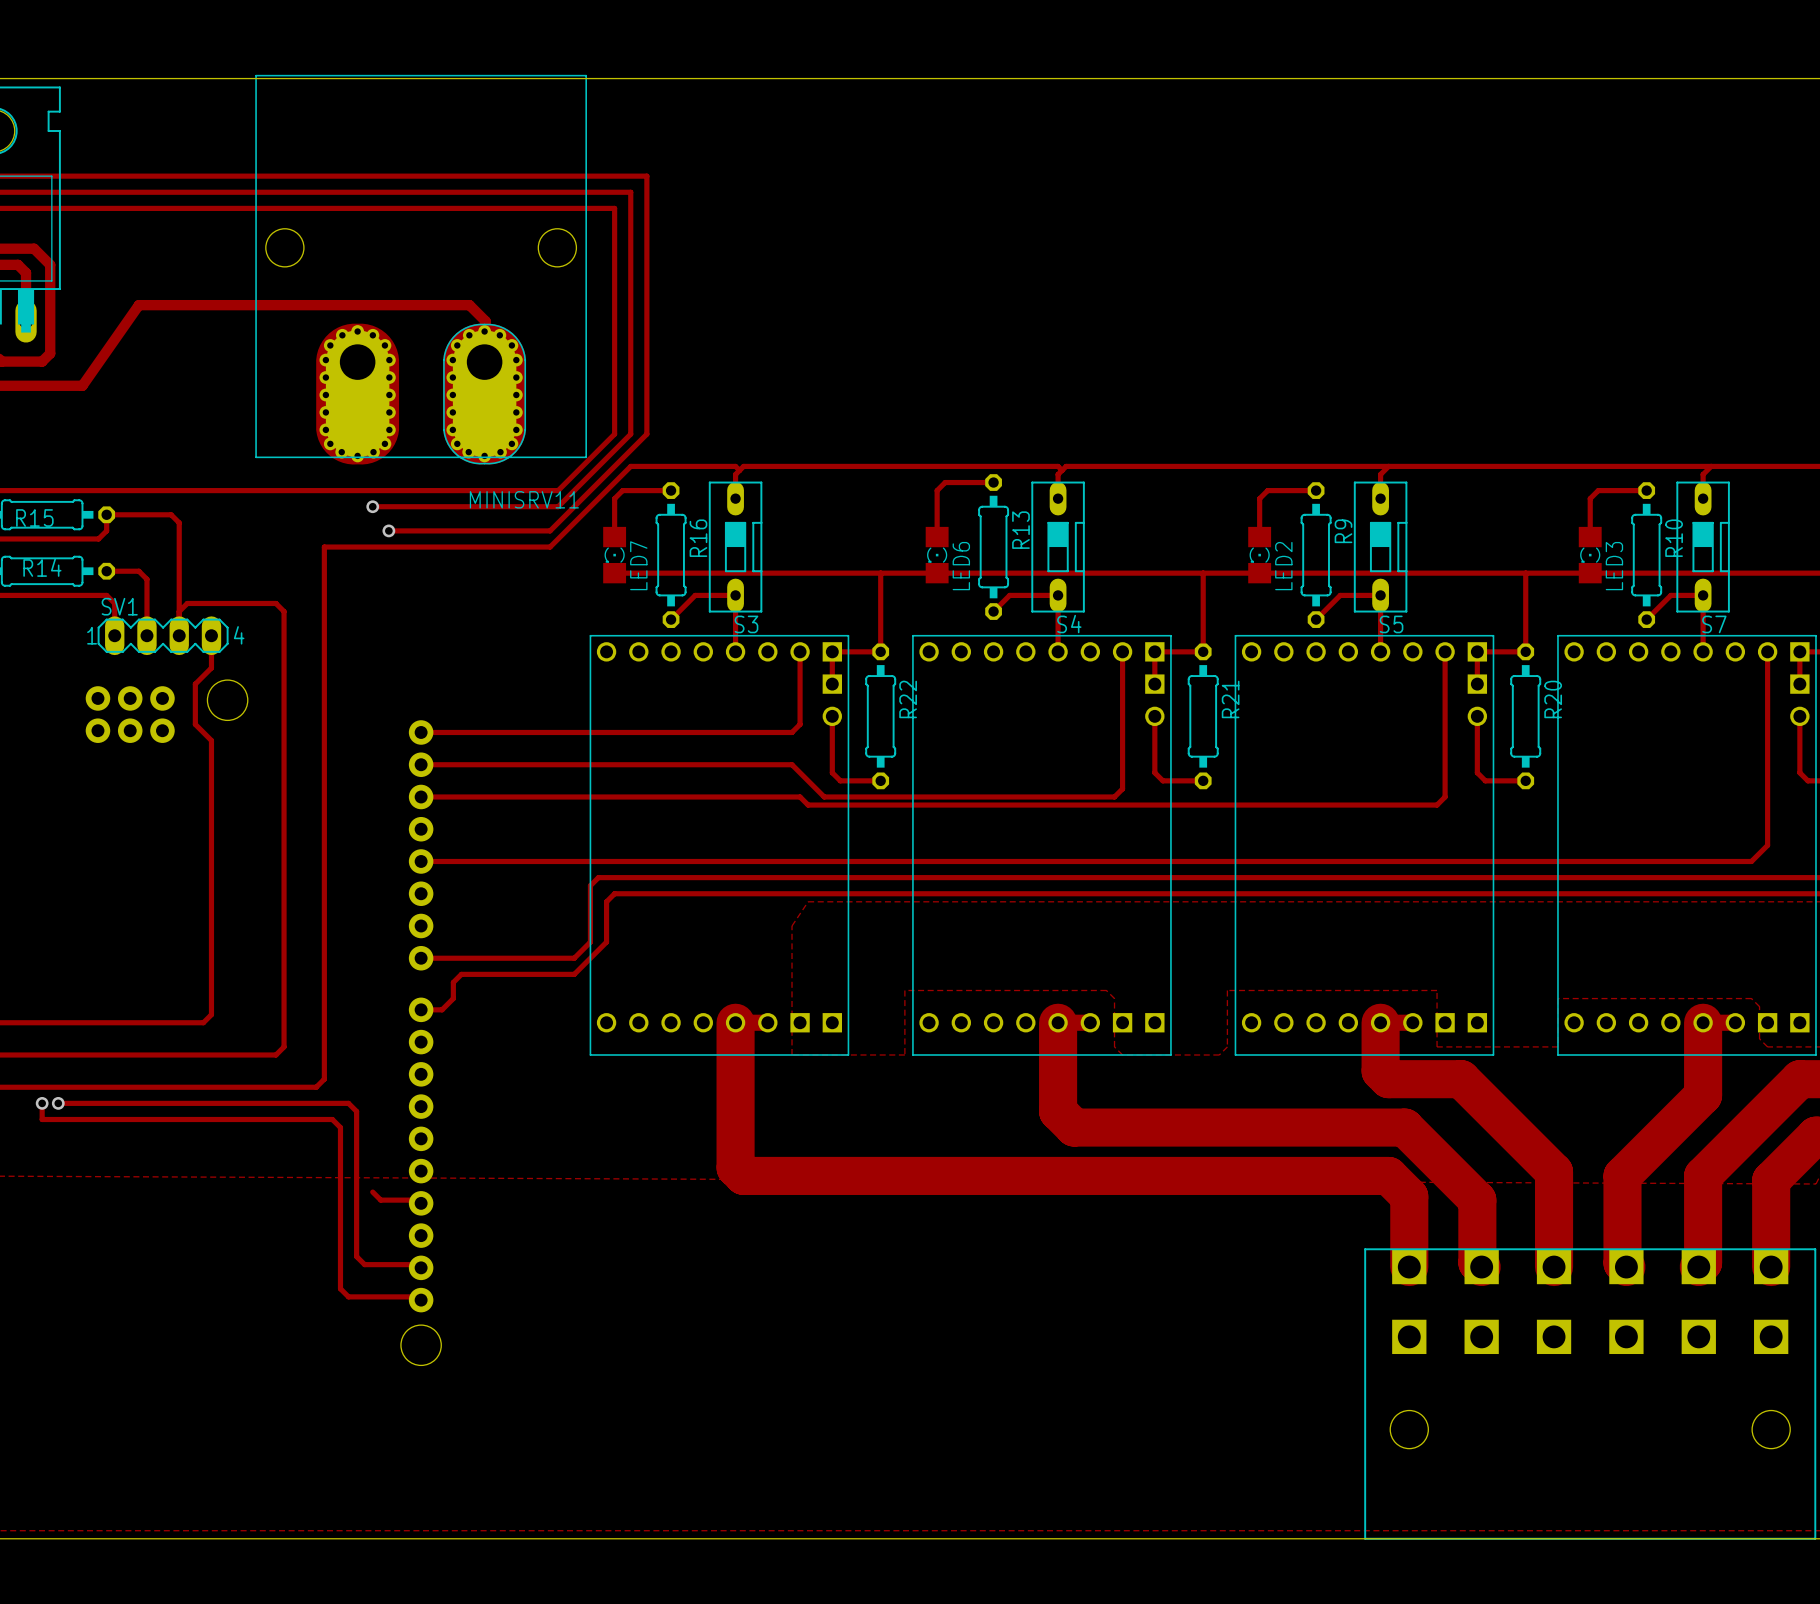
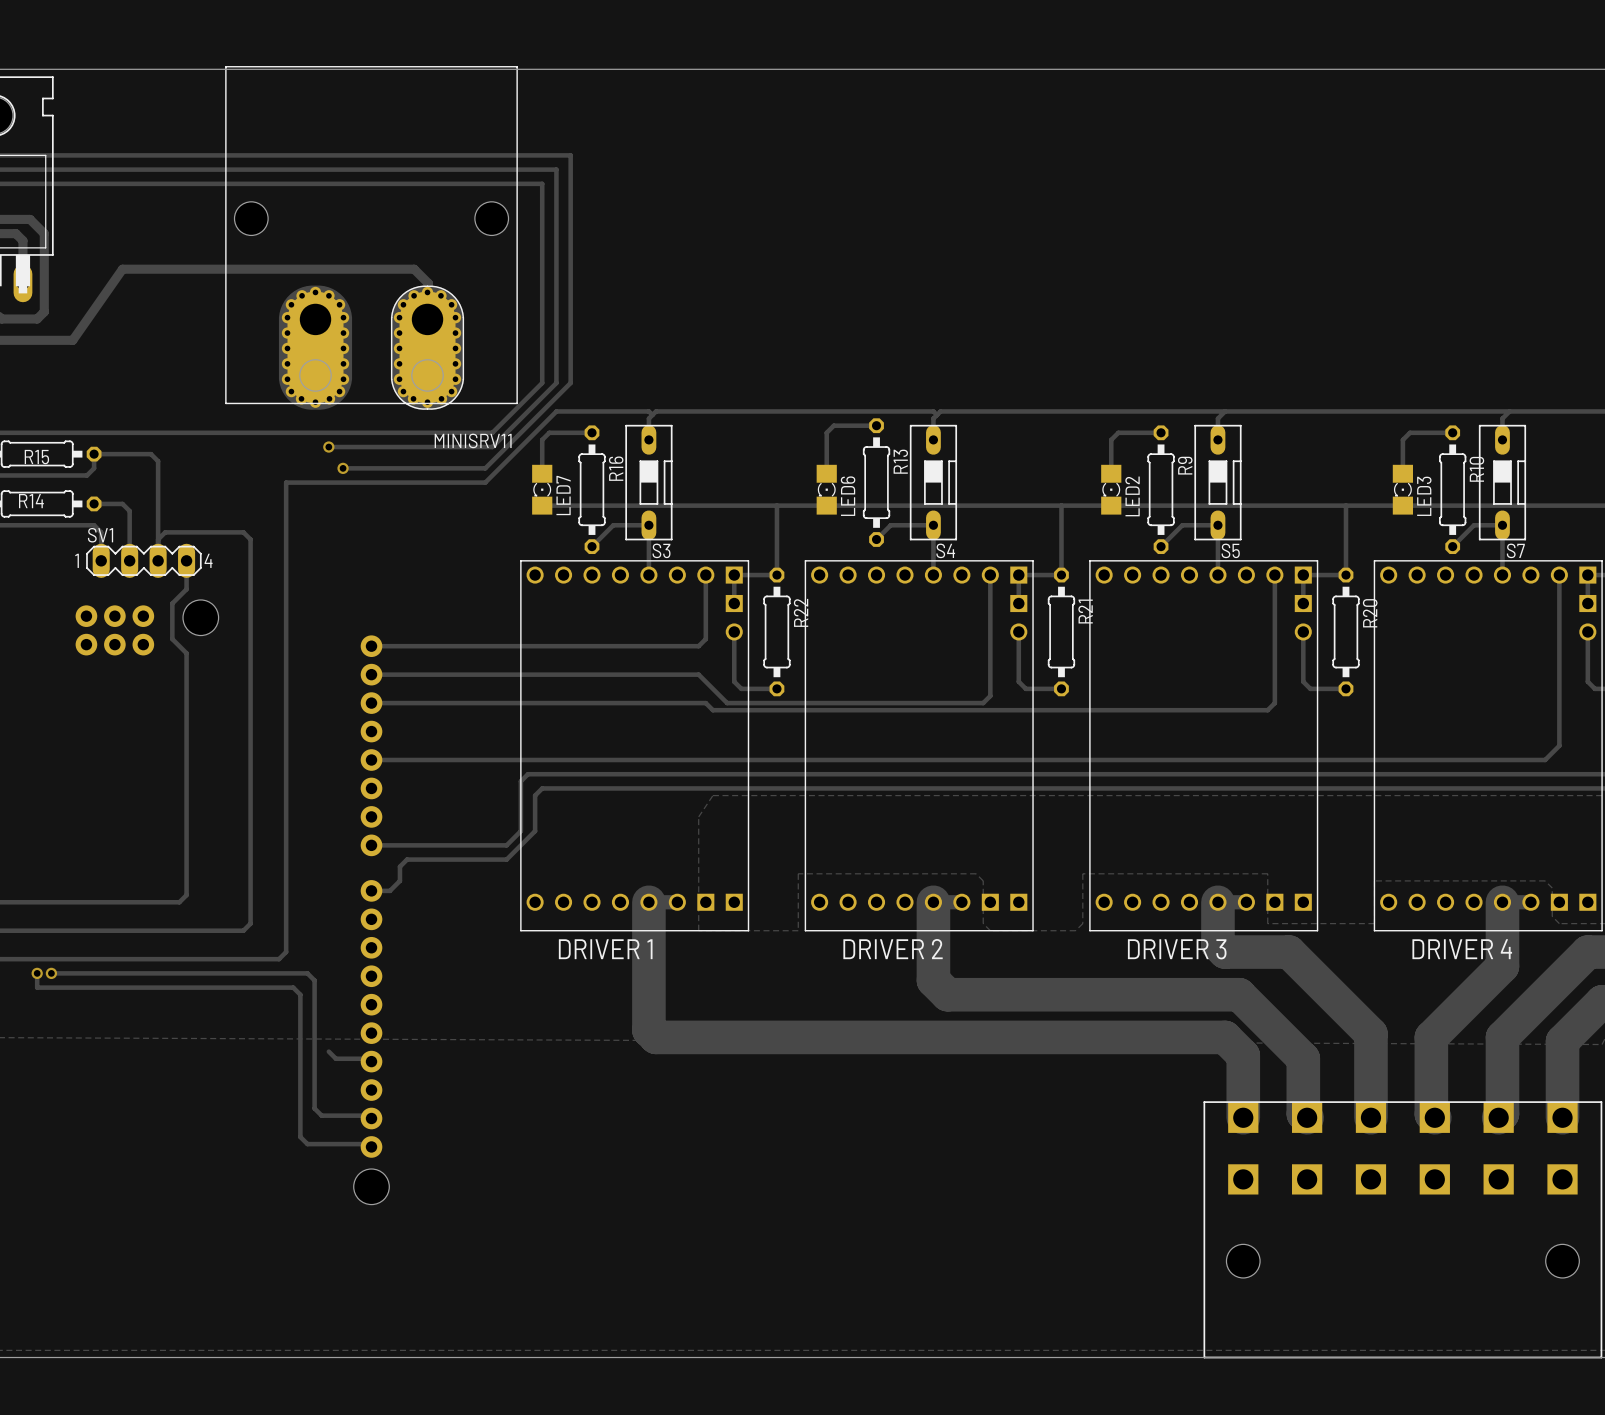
text: none -> DRIVER 1 (605, 949)
text: none -> DRIVER 2 (893, 949)
text: none -> DRIVER 3 (1177, 949)
text: none -> DRIVER 4 (1462, 949)

